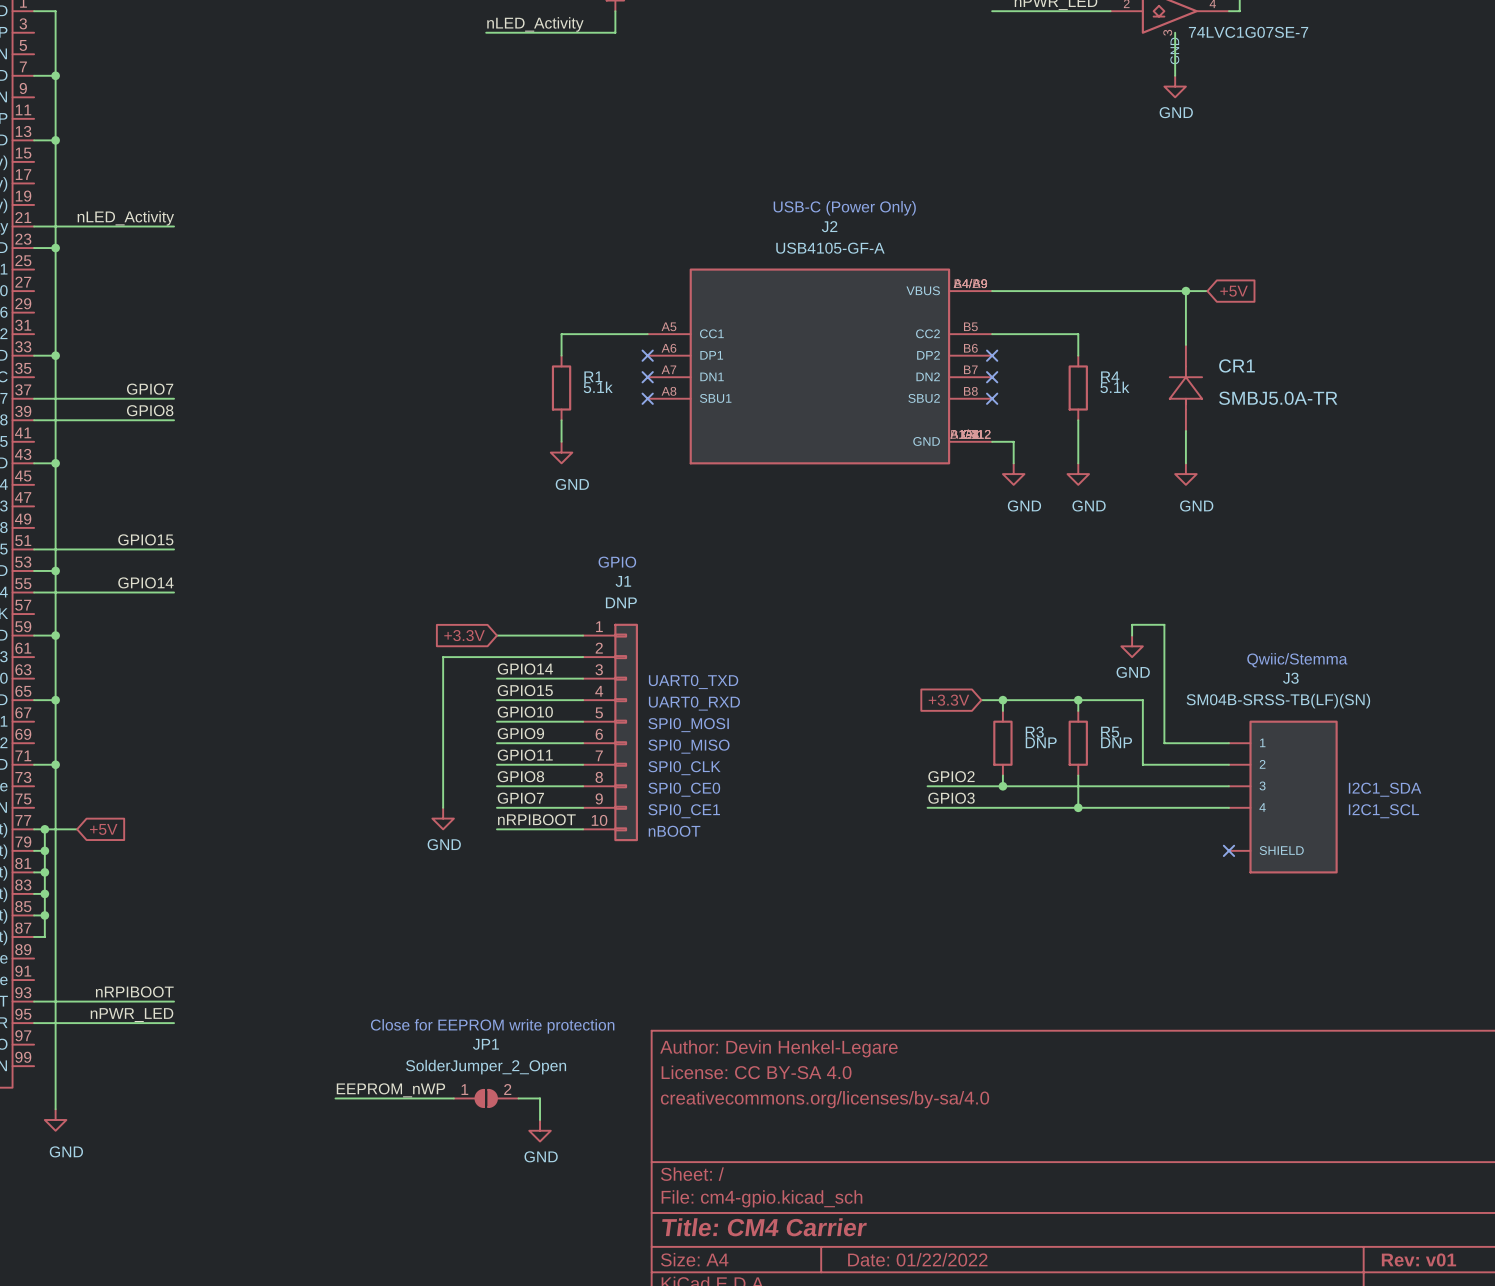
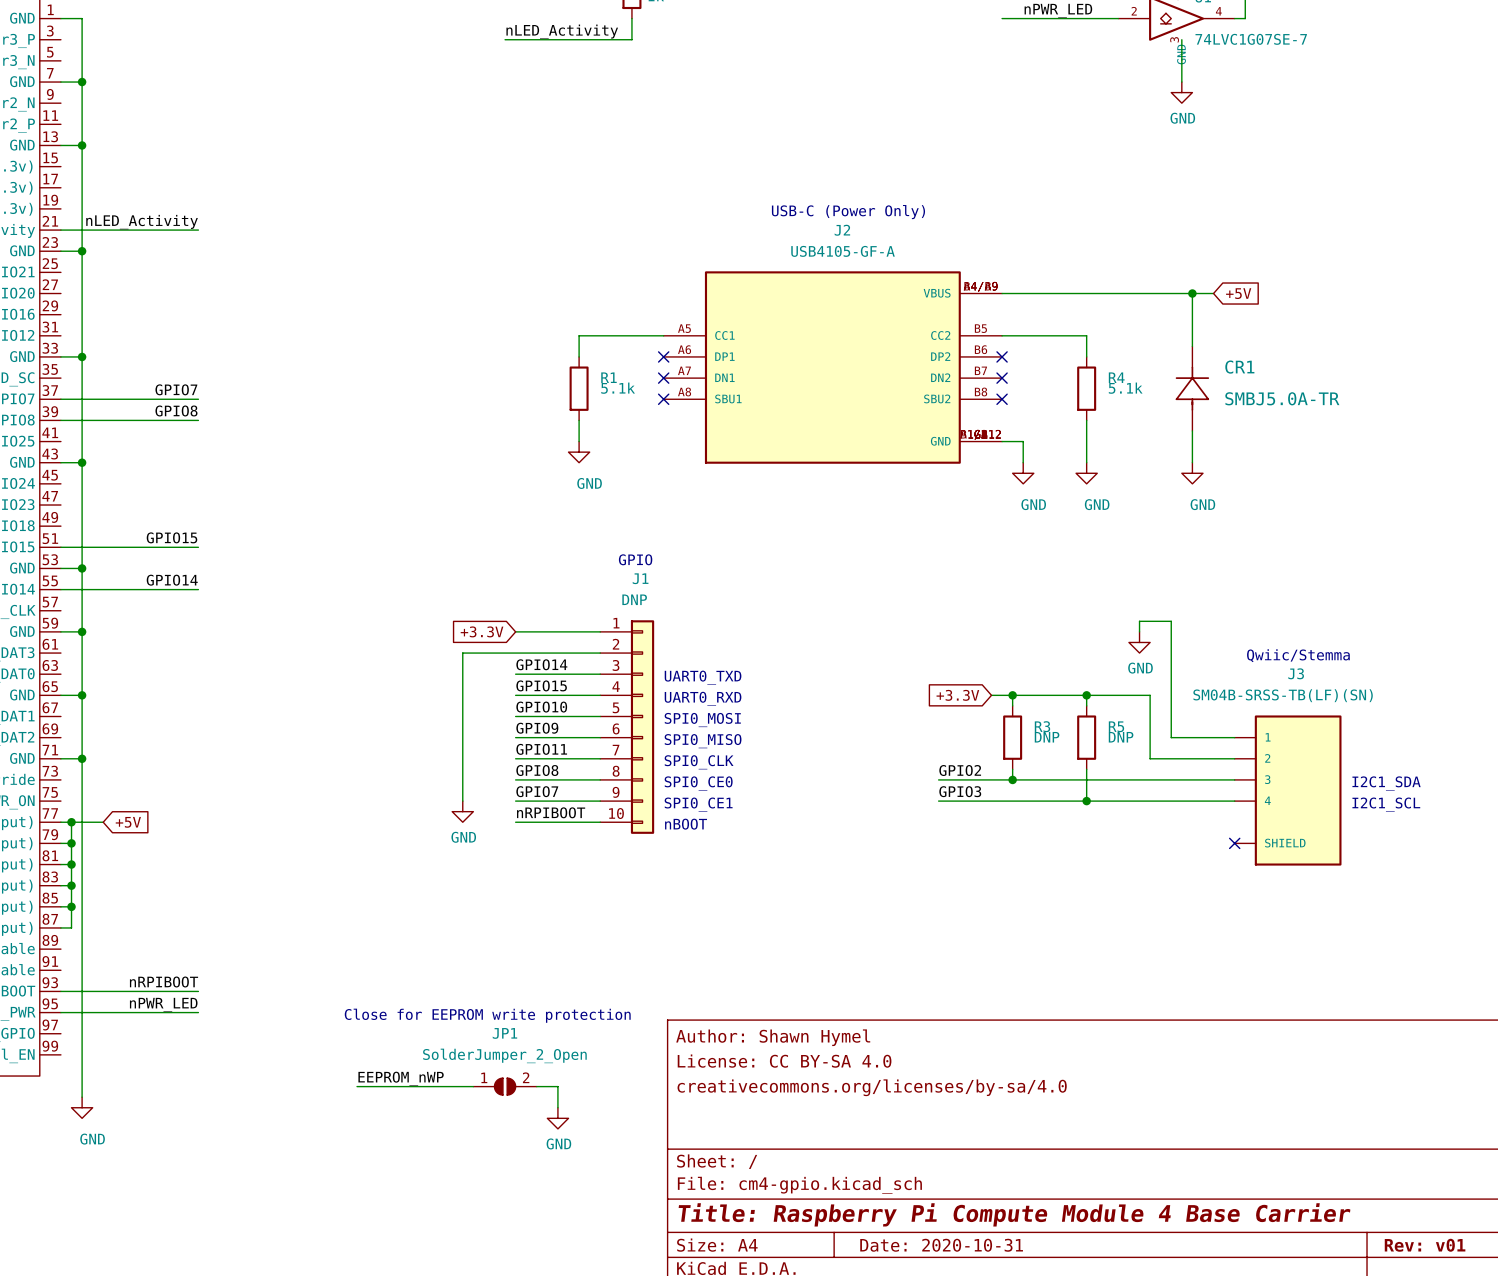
title block: Author: Devin Henkel-Legare (778, 1048) -> Author: Shawn Hymel (773, 1037)
title block: Title: CM4 Carrier (764, 1227) -> Title: Raspberry Pi Compute Module 4 Base Carrier (1014, 1214)
title block: Date: 01/22/2022 (917, 1259) -> Date: 2020-10-31 (941, 1245)

